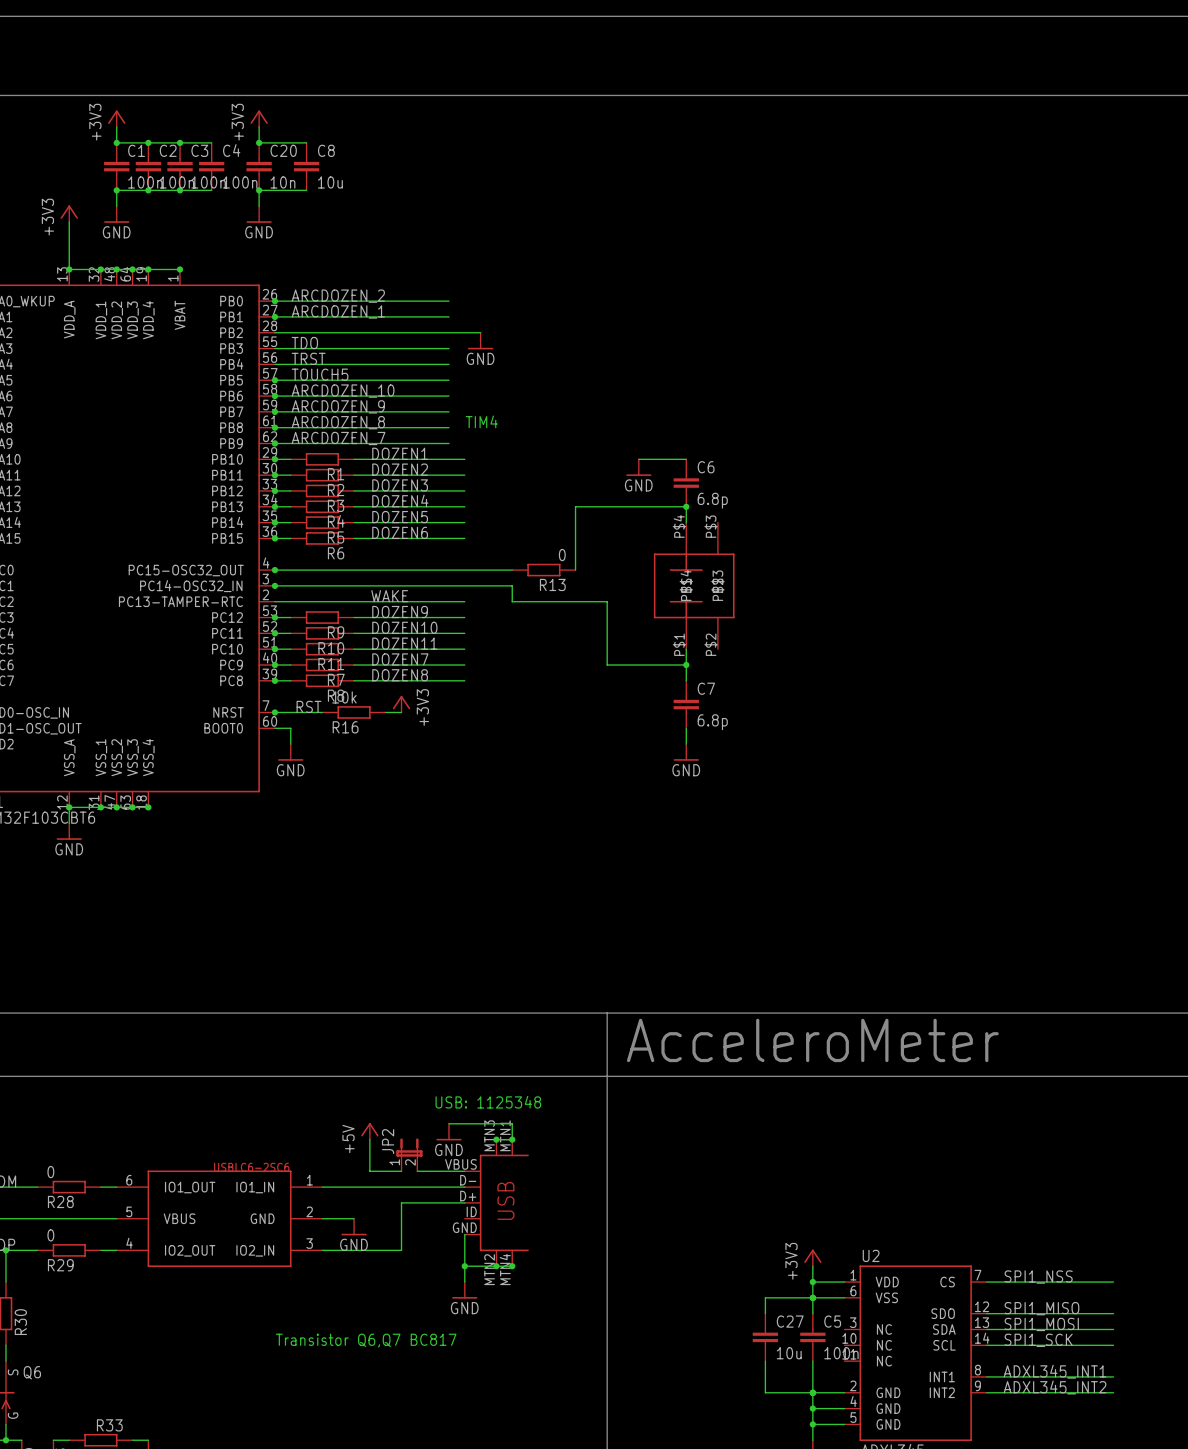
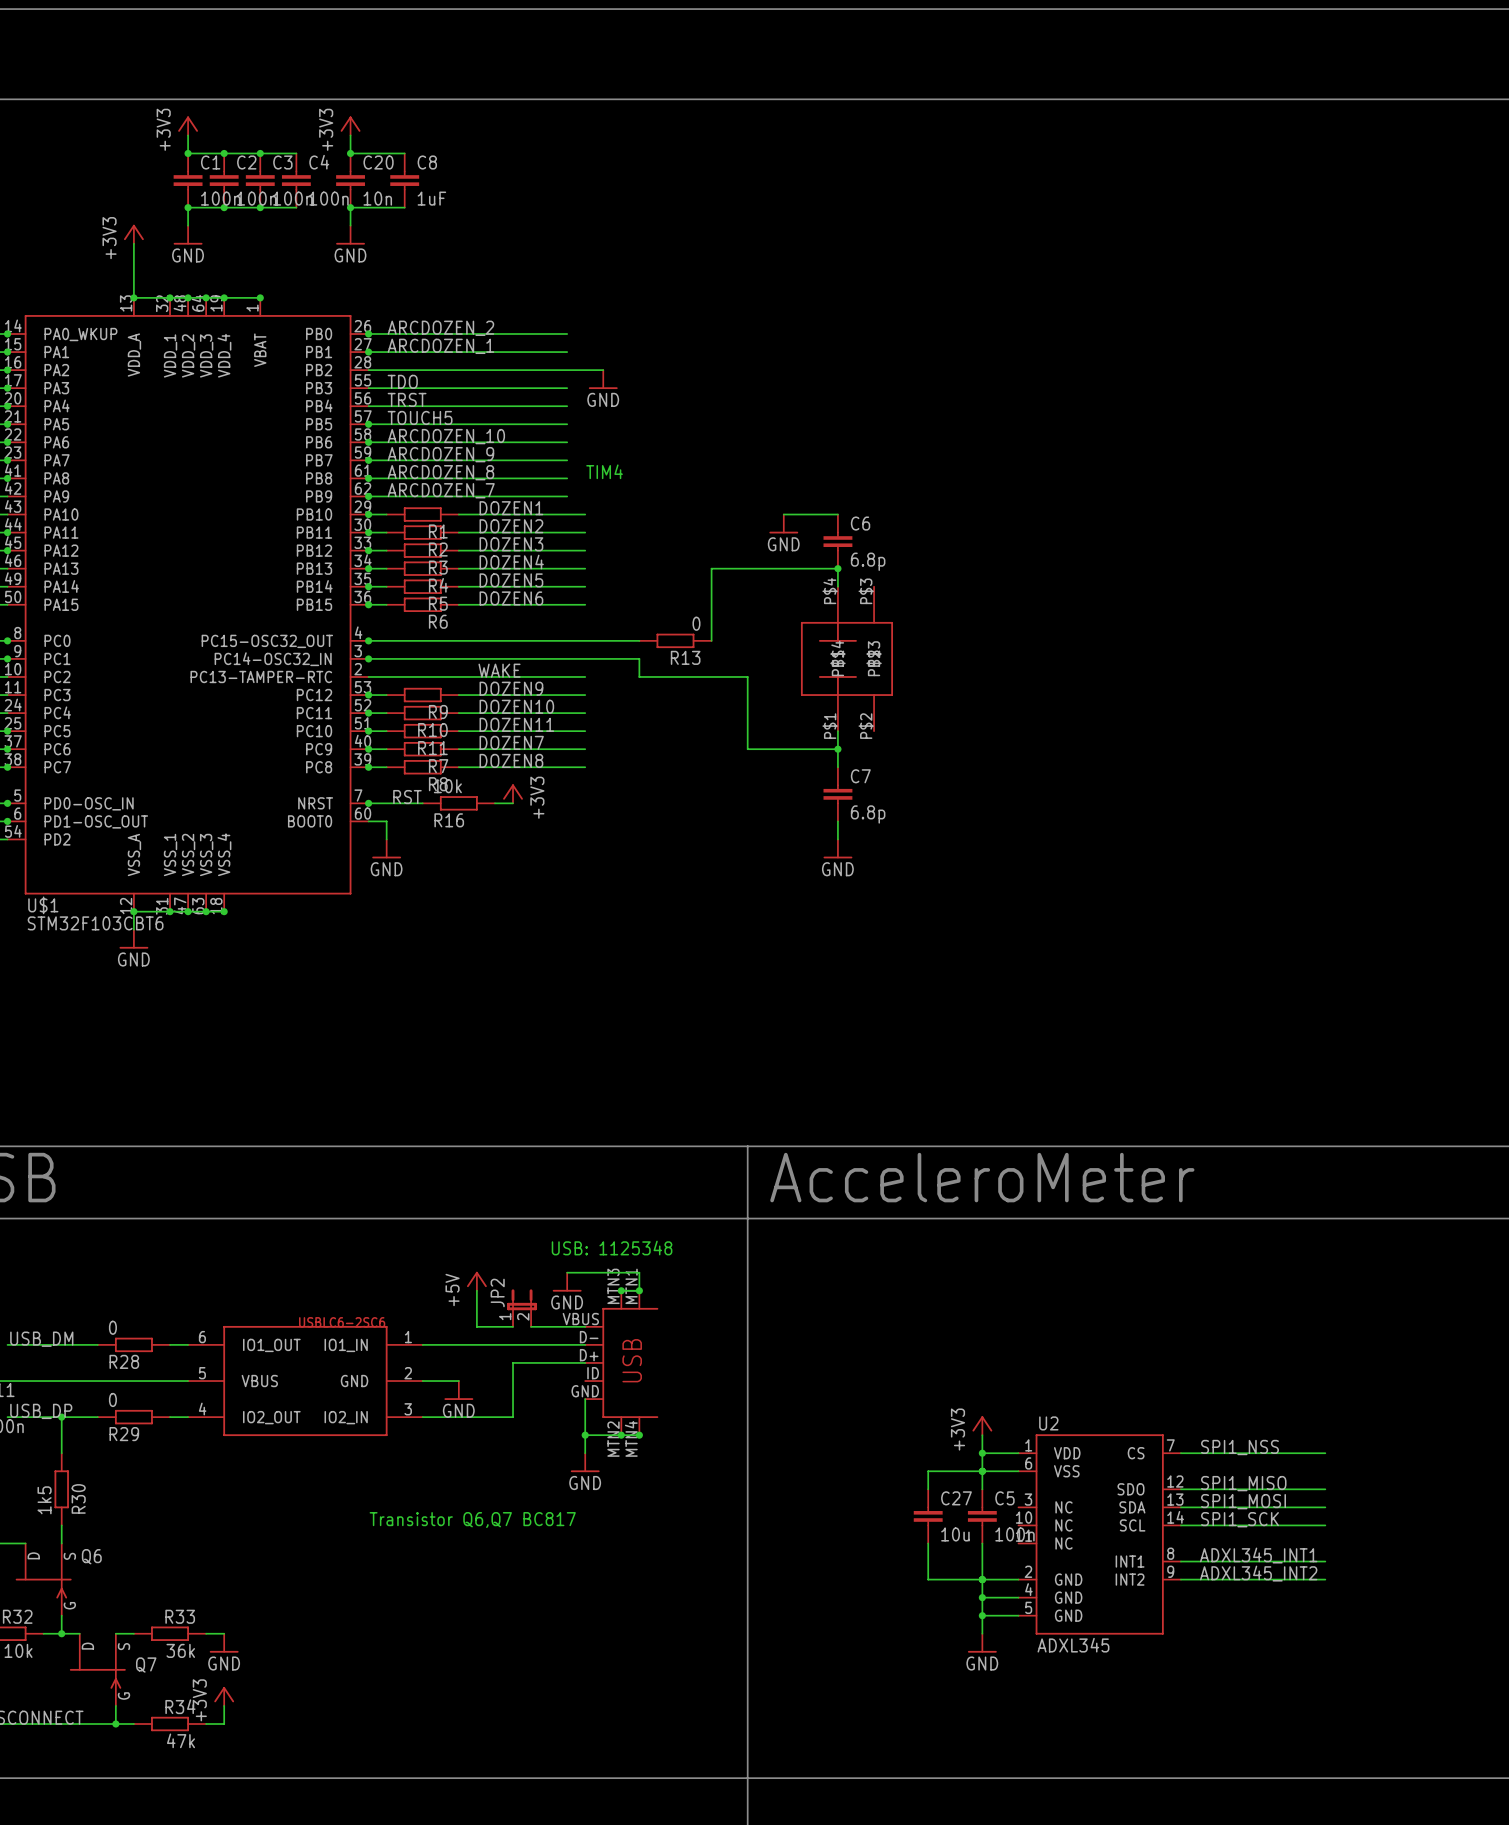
C8 value: 10u (330, 182) -> 1uF (431, 198)

